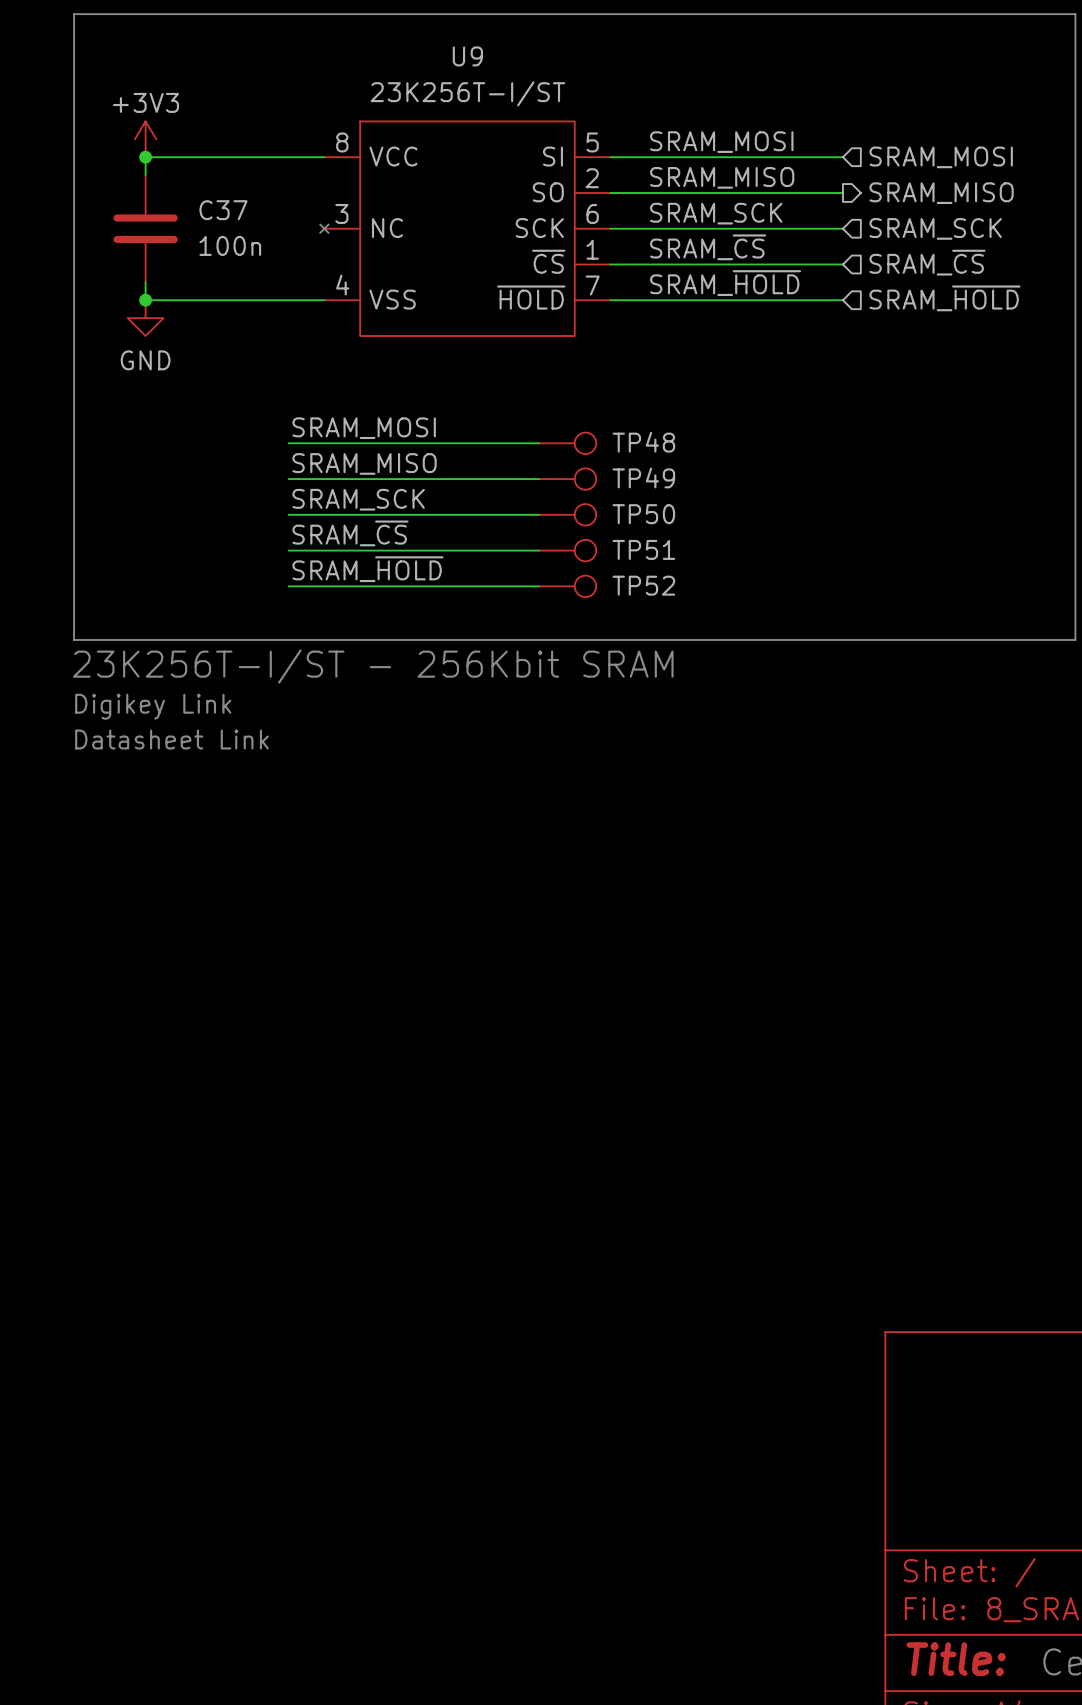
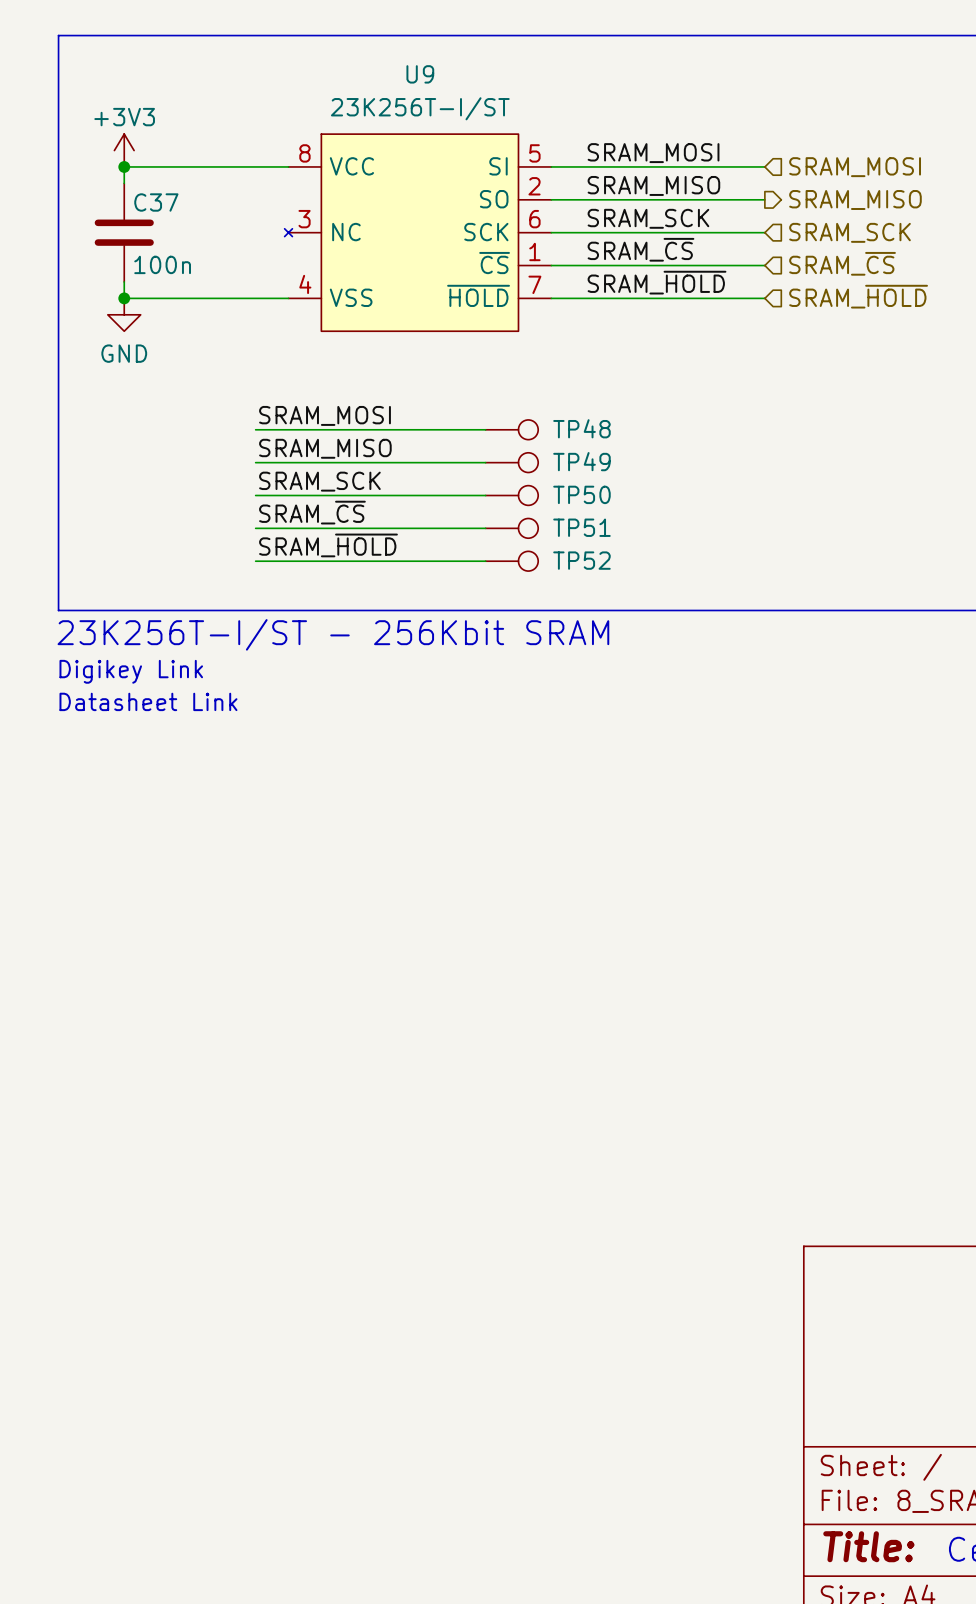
C37 name position: C37 (223, 210) -> C37 (156, 202)
C37 value position: 100n (230, 245) -> 100n (162, 264)

